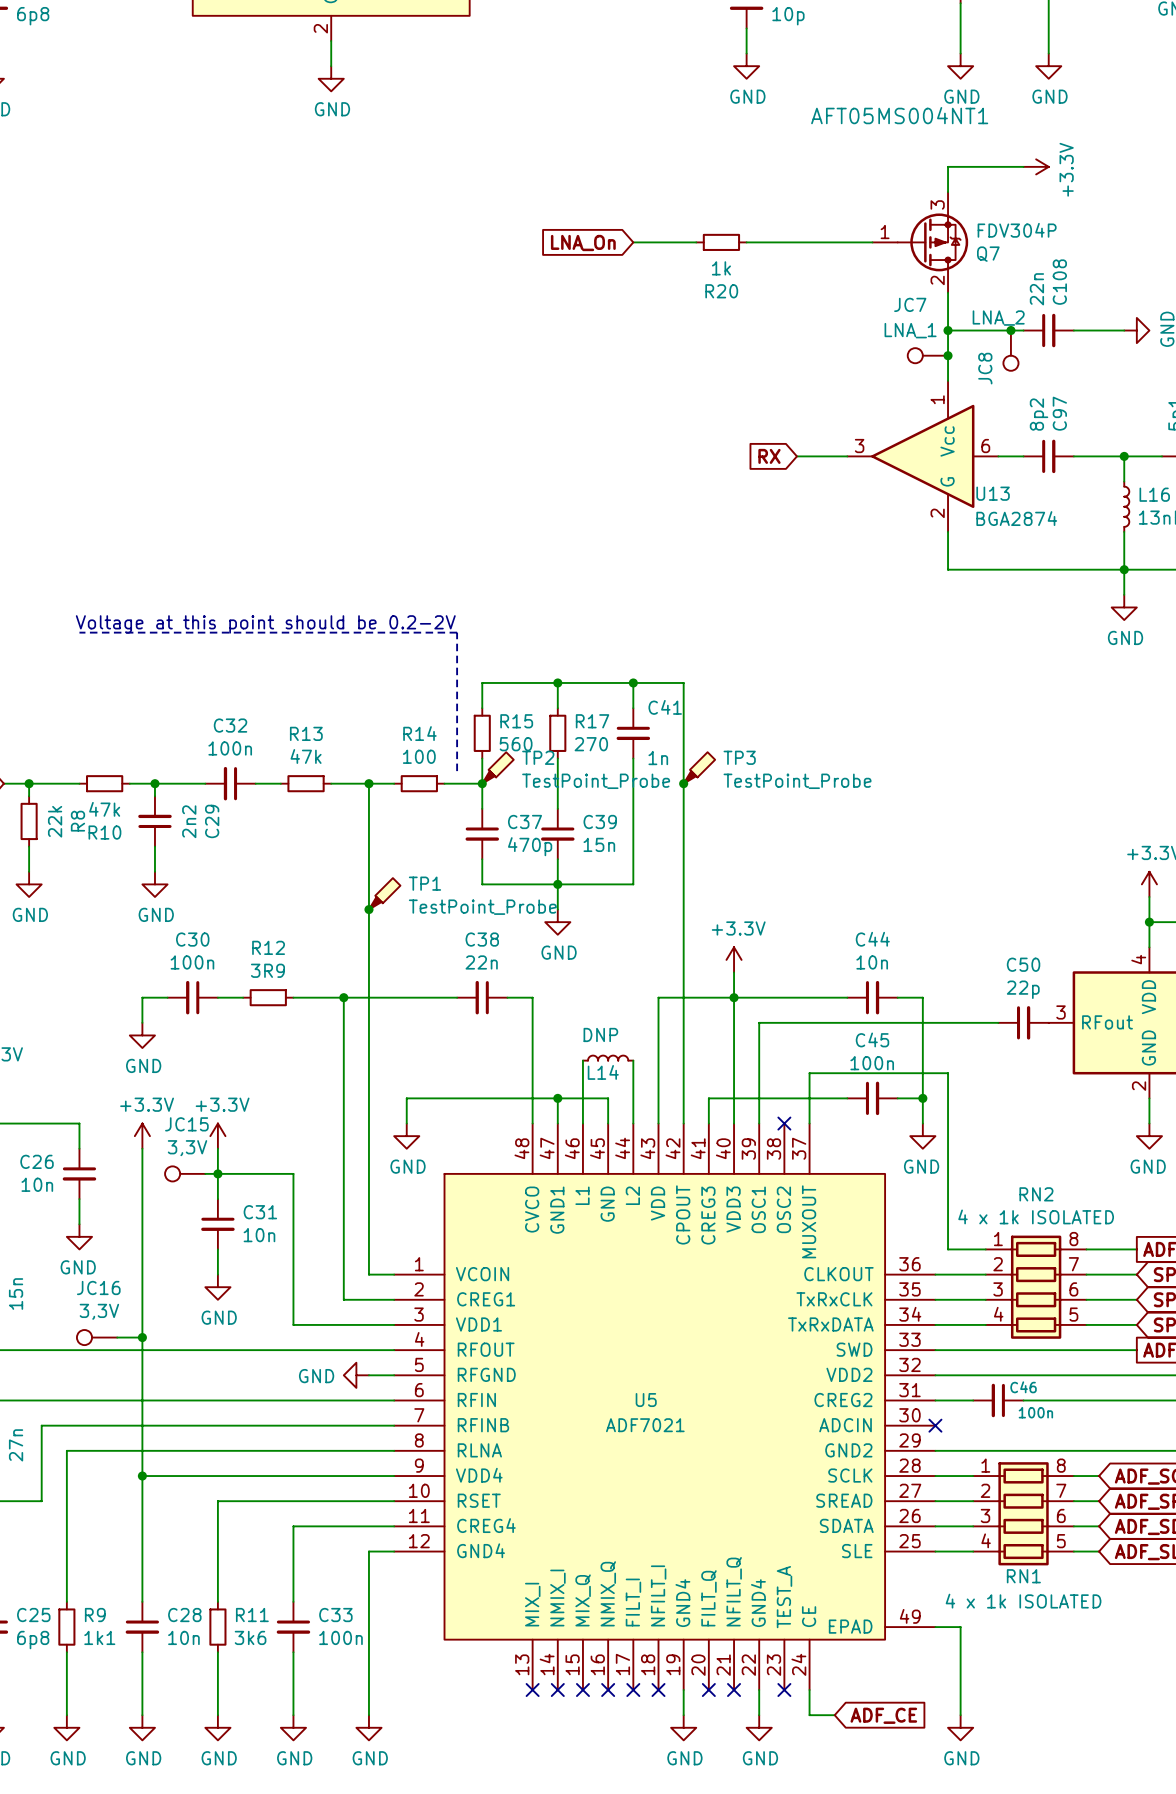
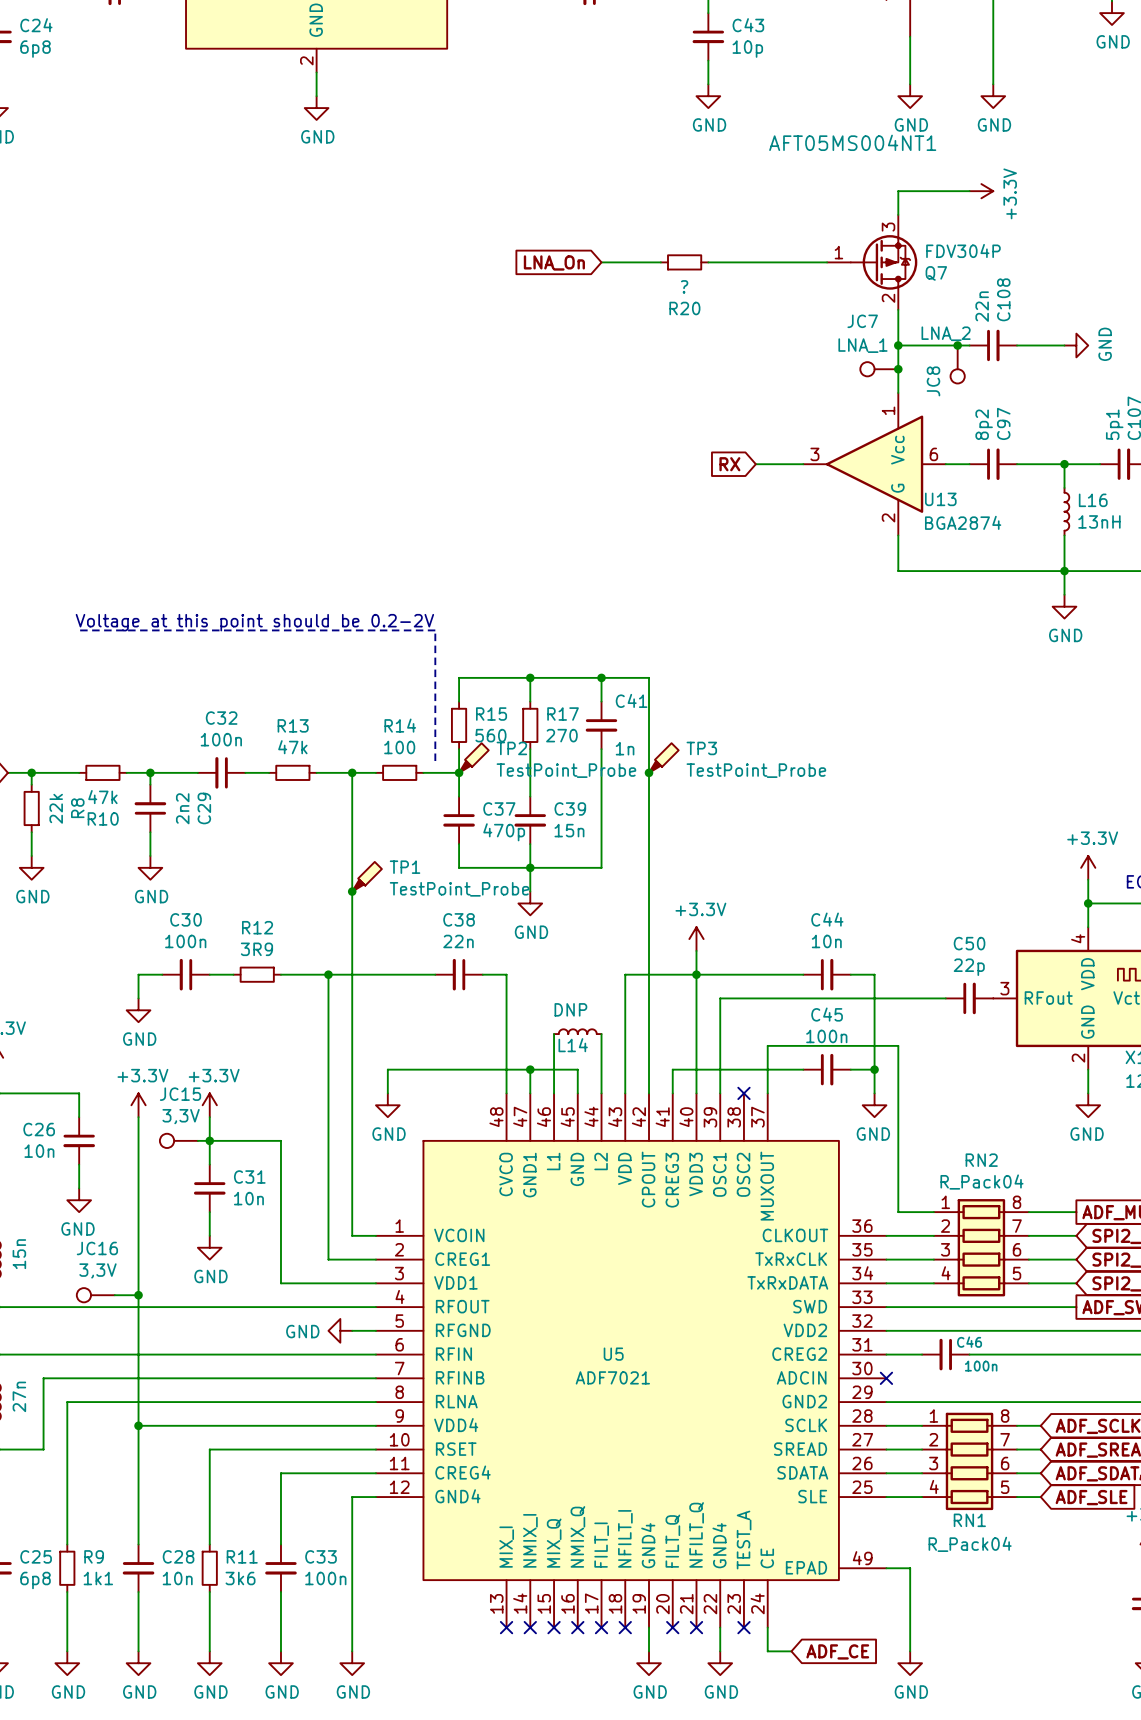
R20 value: 1k (721, 268) -> ? (684, 286)
RN2 value: 4 x 1k ISOLATED (1036, 1216) -> R_Pack04 (981, 1182)
RN1 value: 4 x 1k ISOLATED (1023, 1601) -> R_Pack04 (970, 1544)

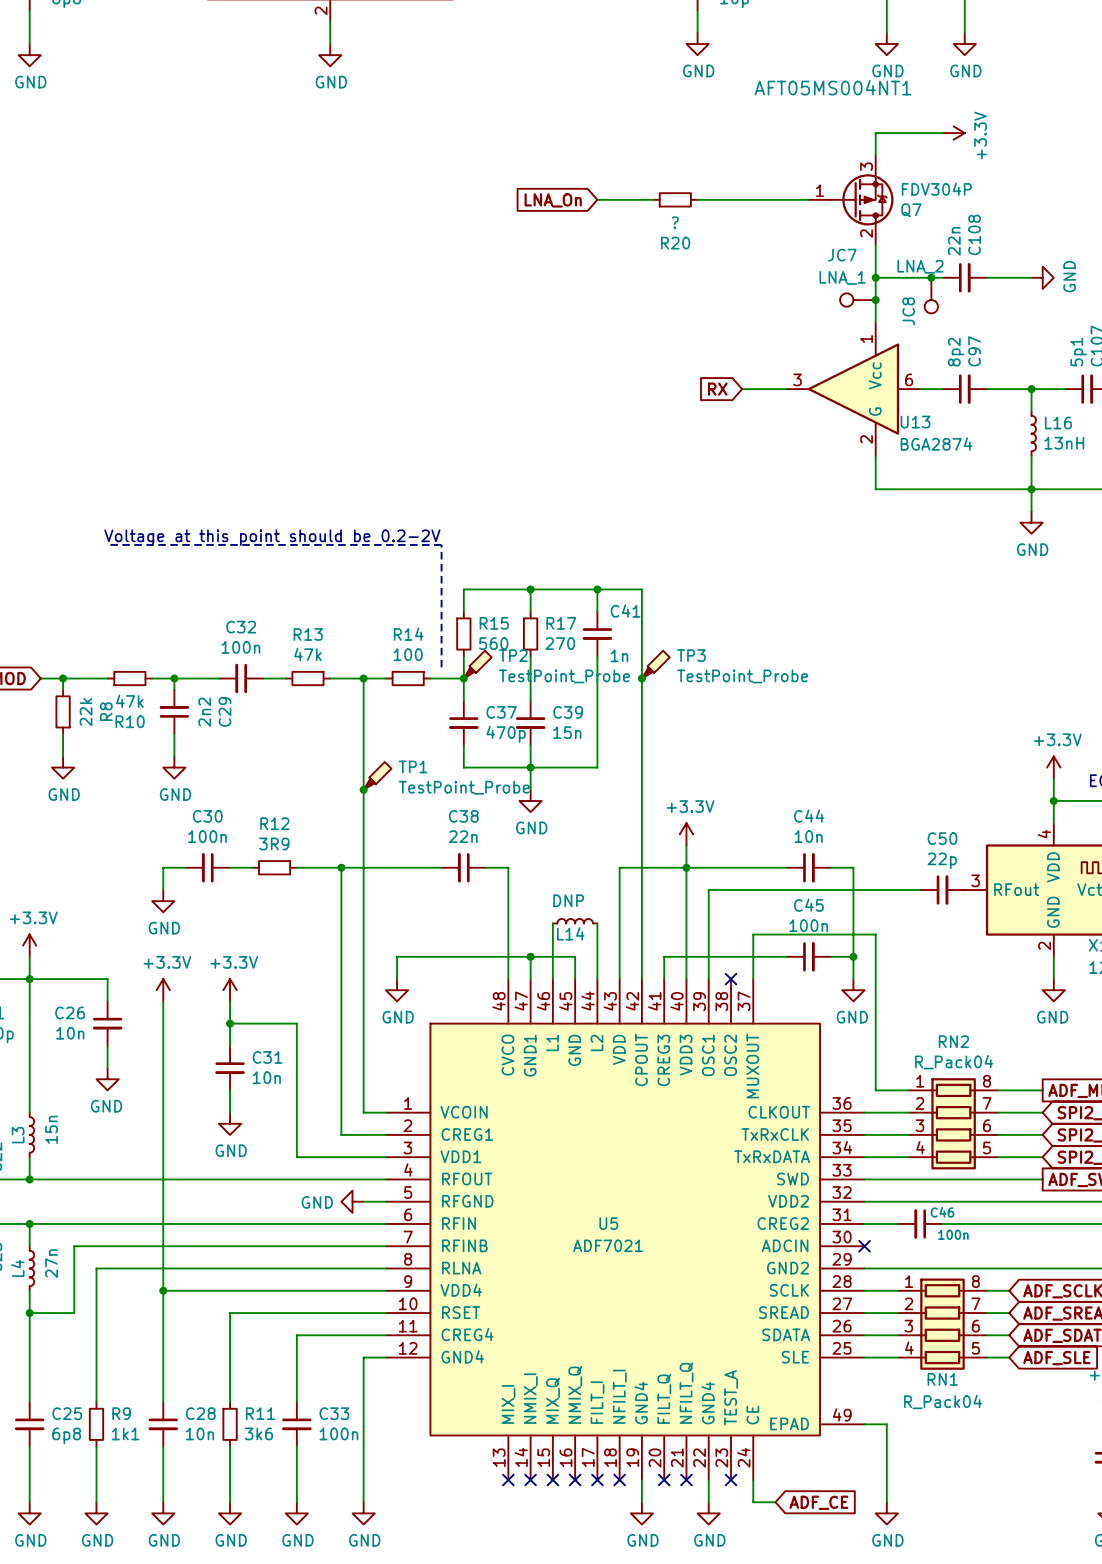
JC15: 3,3V (178, 1140) -> none
wire: (197, 1140) (209, 1140) -> none
JC16: 3,3V (95, 1295) -> none
wire: (114, 1295) (138, 1295) -> none
junction: (138, 1295) -> none

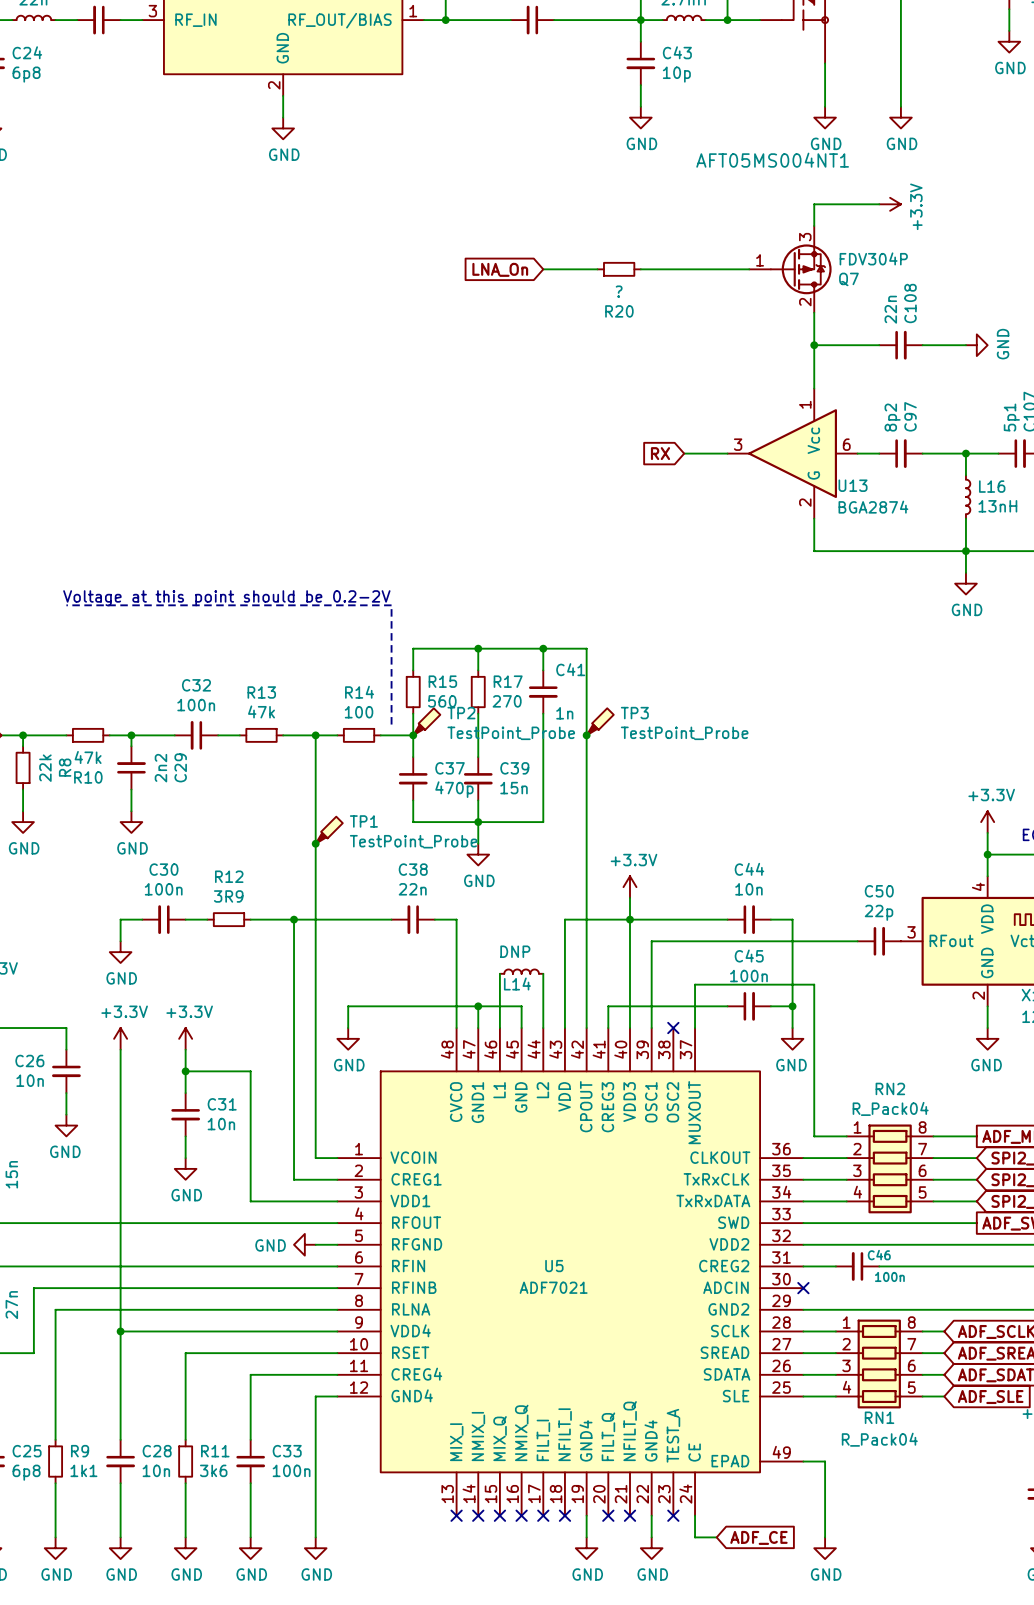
junction: (931, 277) -> none
JC8: LNA_2 (931, 295) -> none
JC7: LNA_1 (857, 300) -> none
junction: (875, 300) -> none

